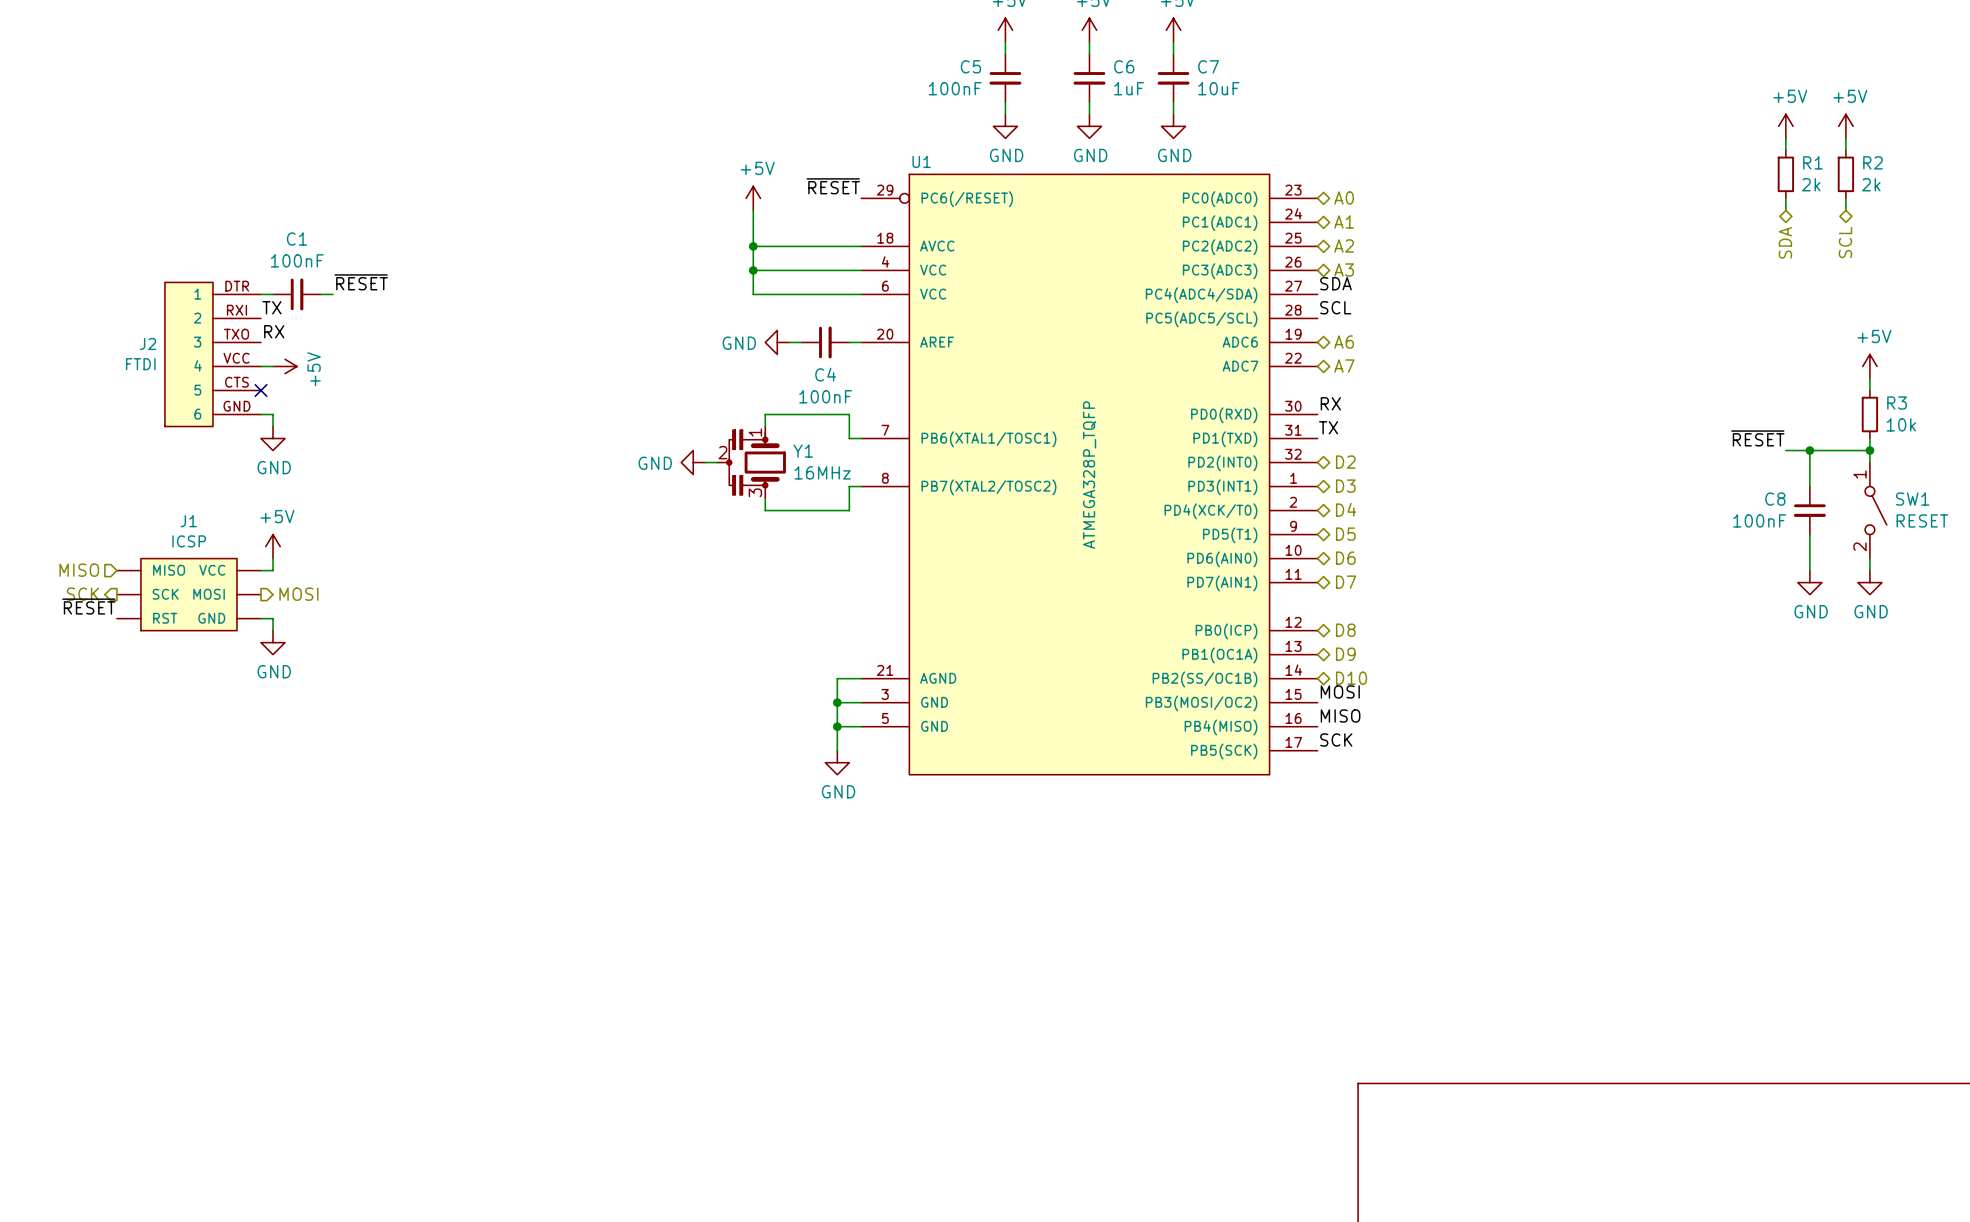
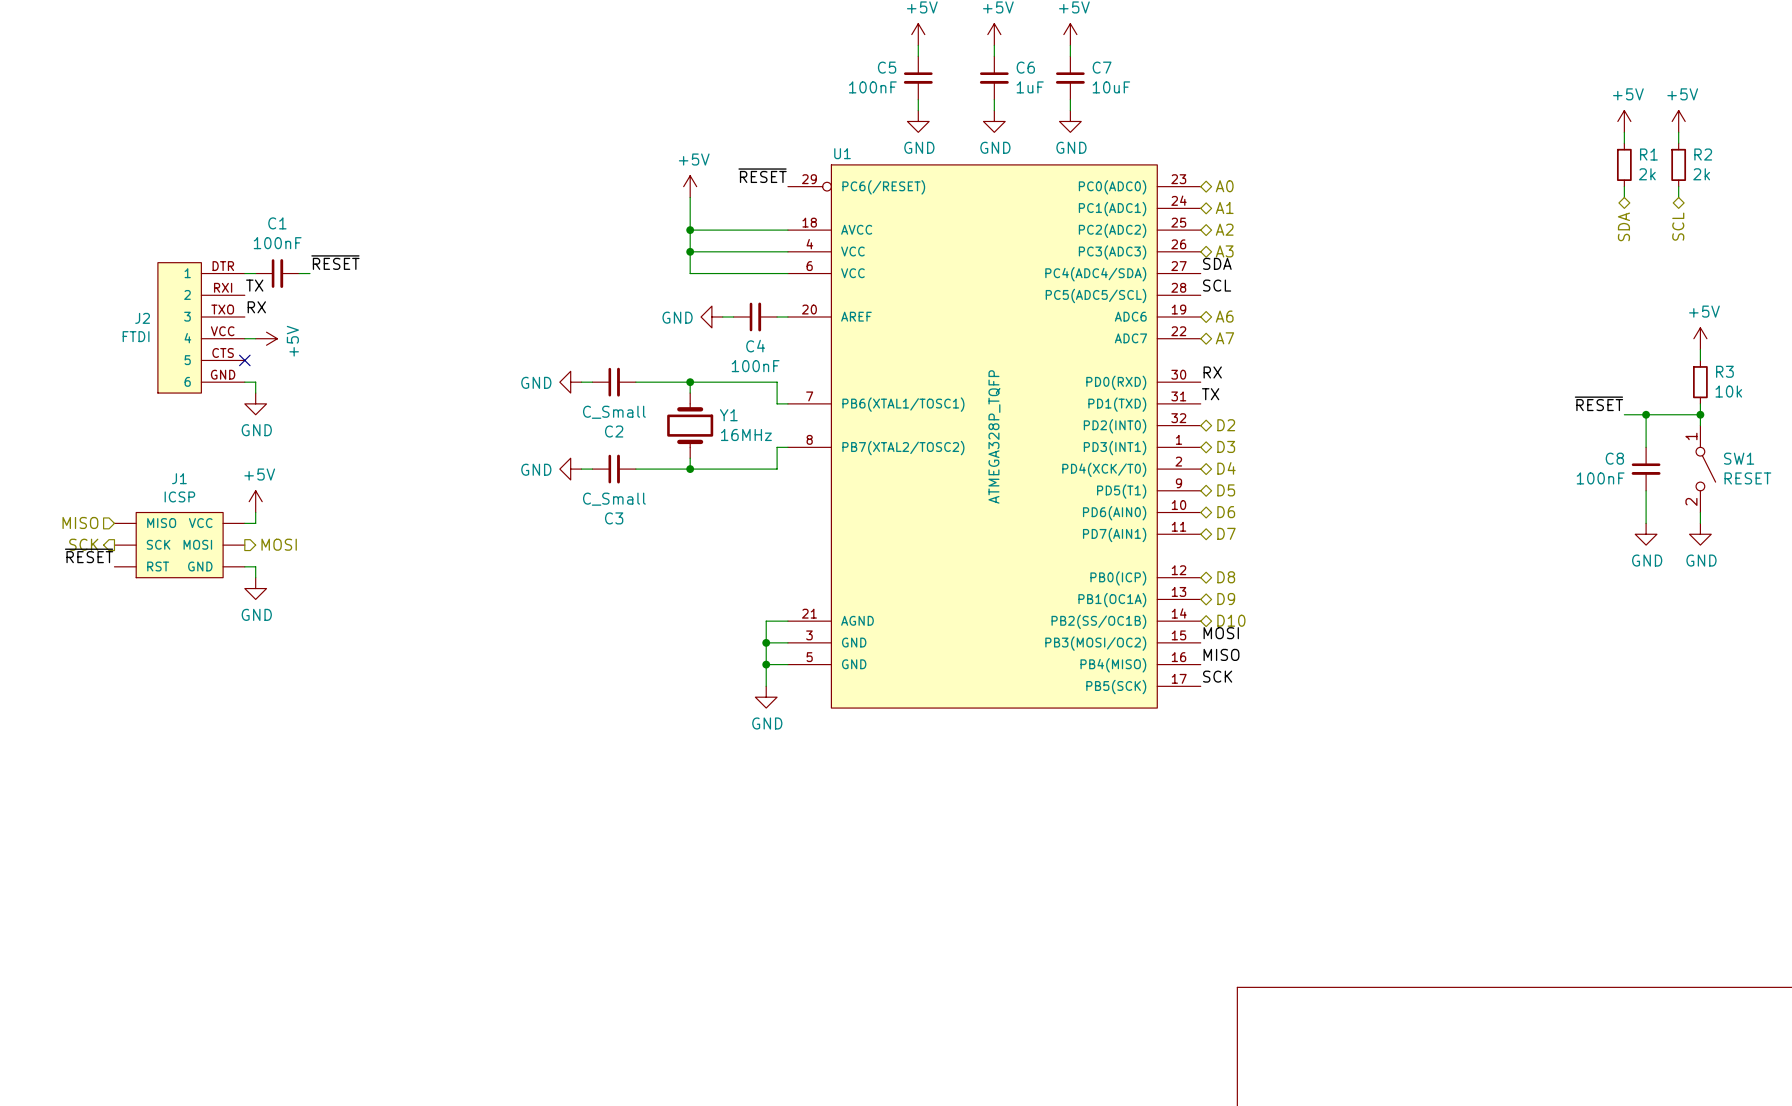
power symbol: none -> GND (570, 382)
C2: none -> C_Small (614, 382)
wire: none -> (690, 382) (690, 393)
junction: none -> (690, 382)
wire: (765, 414) (765, 426) -> (701, 382) (635, 382)
Y1 symbol: [717, 426, 786, 499] -> [667, 393, 714, 459]
power symbol: GND (693, 462) -> none
wire: (705, 462) (717, 462) -> (581, 382) (592, 382)
wire: none -> (690, 458) (690, 469)
wire: (765, 498) (765, 510) -> (635, 469) (701, 469)
power symbol: none -> GND (570, 469)
wire: none -> (581, 469) (592, 469)
C3: none -> C_Small (614, 469)
junction: none -> (690, 469)

